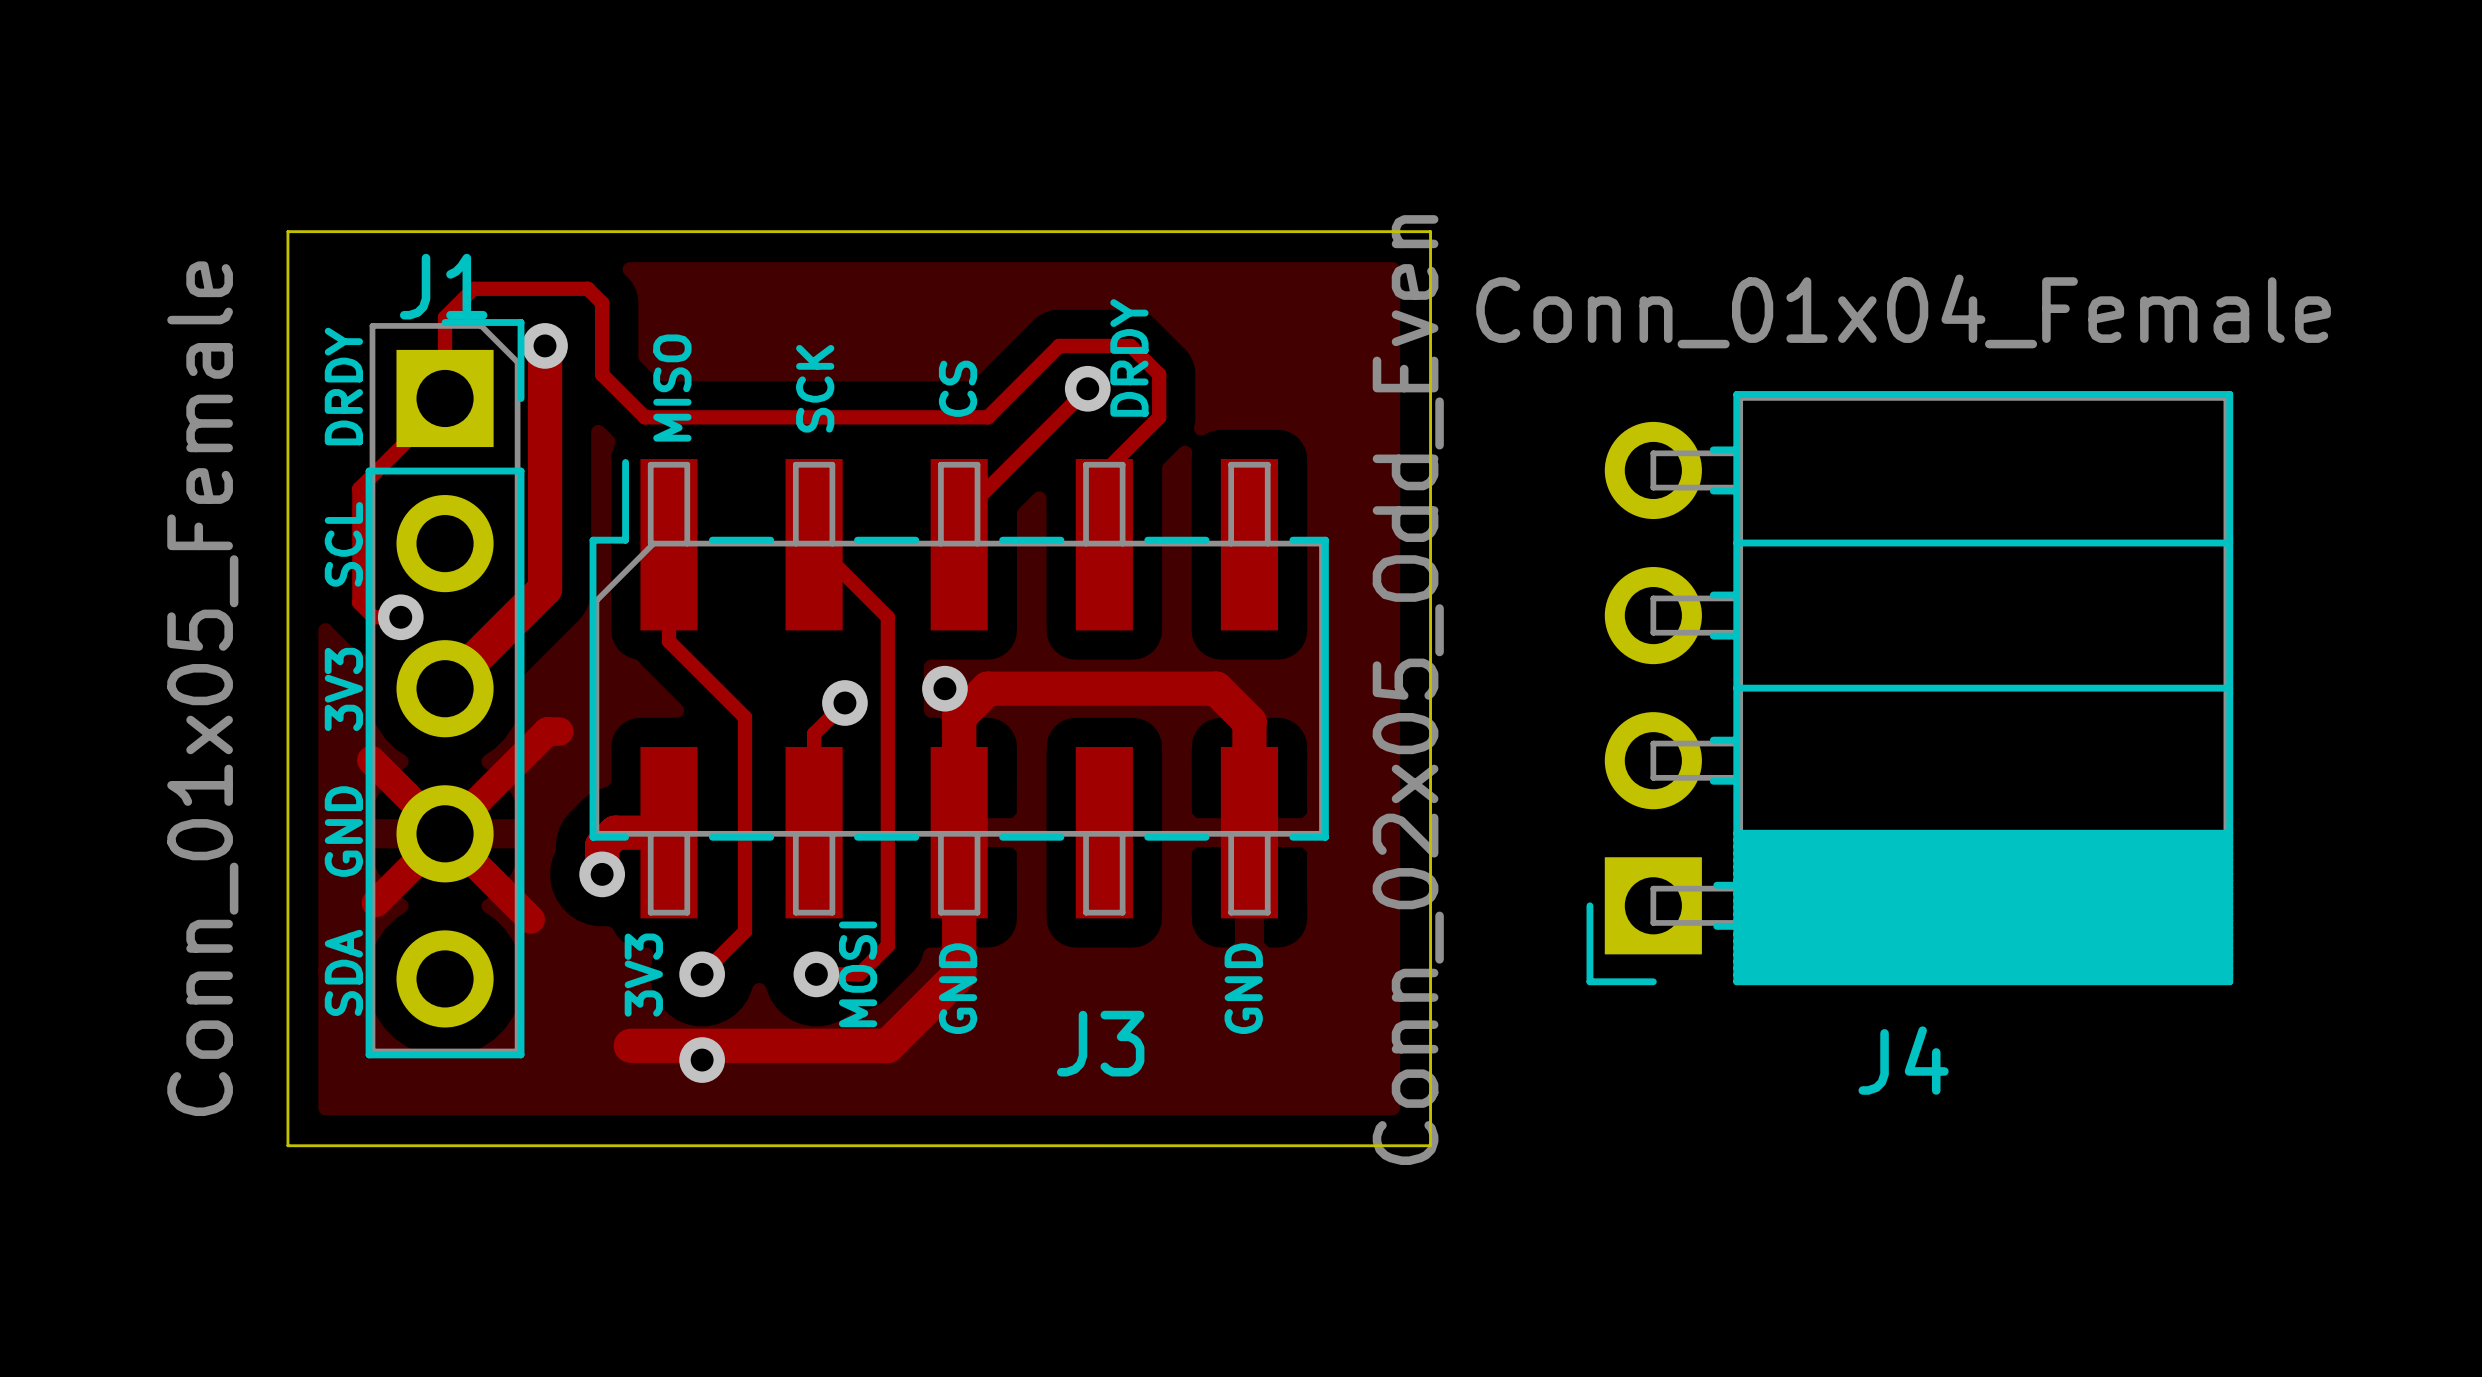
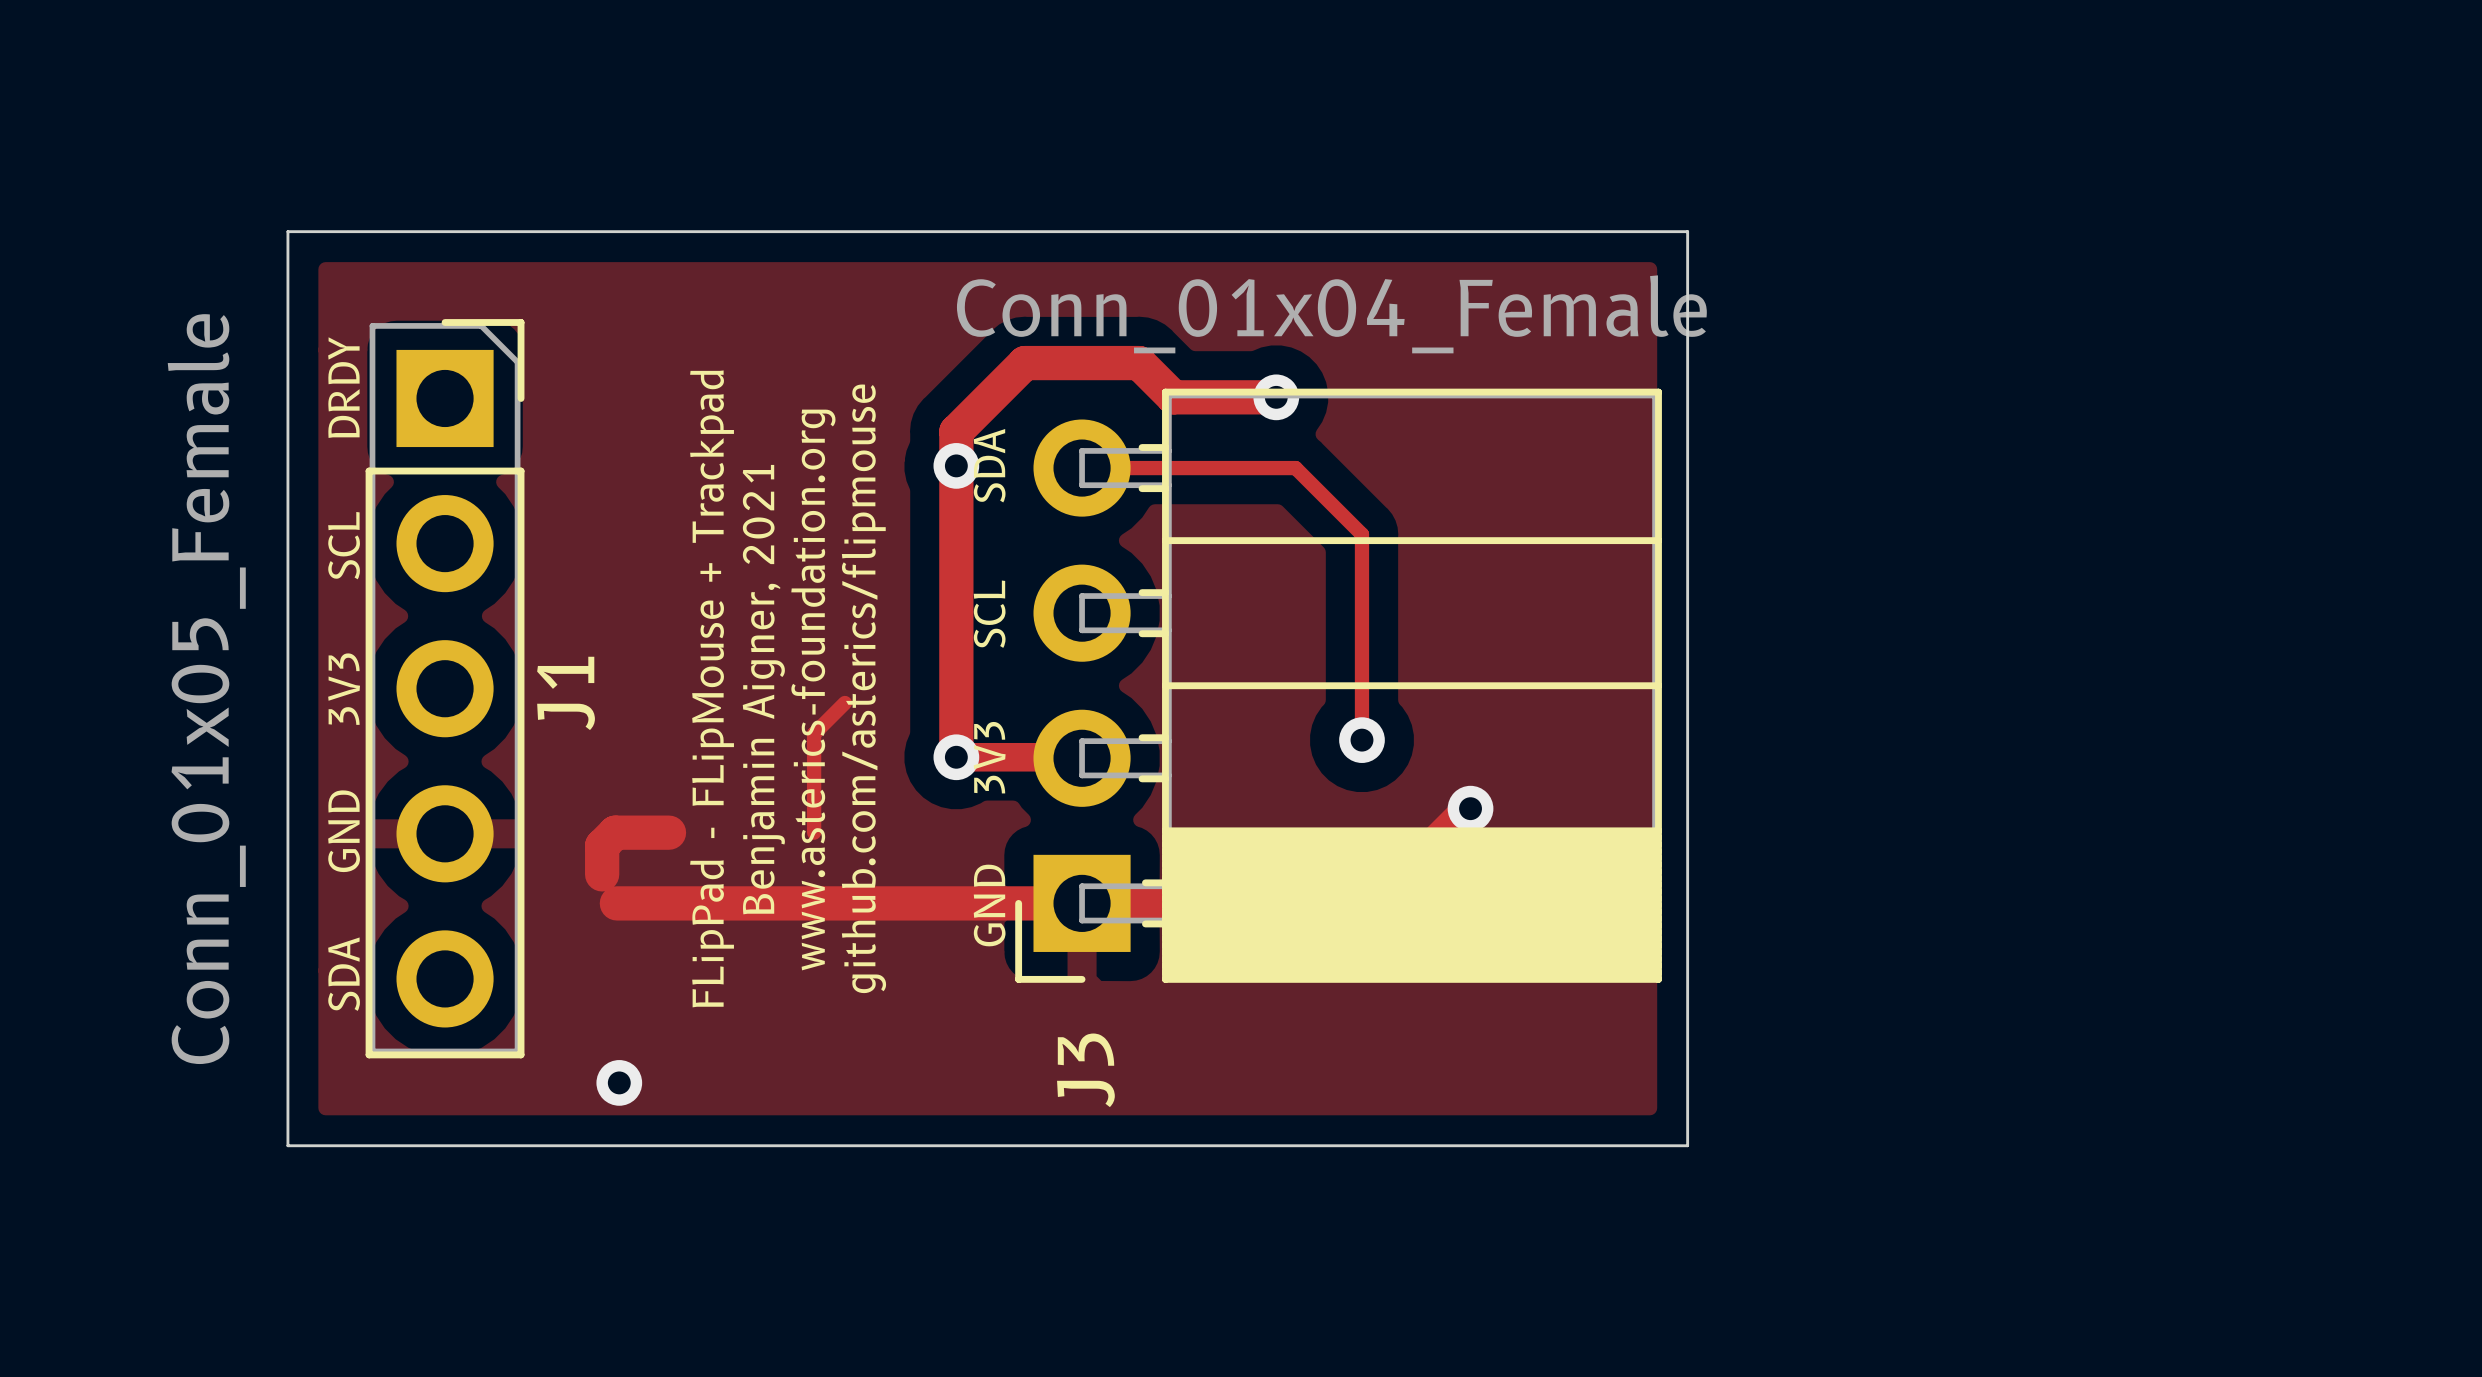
board edge: (1430, 231) (1430, 1145) -> (1430, 231) (1687, 231) (1687, 1145) (1430, 1145)
J1 name rotation: 0° (443, 286) -> 90° counterclockwise (566, 693)
J1 name position: J1 (443, 286) -> J1 (566, 693)
track: (545, 345) (545, 588) (445, 688) -> none
via: (545, 345) -> none
text: DRDY (1129, 357) -> none
text: MISO (672, 388) -> none
text: SCK (815, 388) -> none
text: CS (958, 388) -> none
track: (1087, 388) (959, 517) (959, 544) -> none
via: (1087, 388) -> none
track: none -> (1276, 397) (1173, 397) (1139, 363) (1024, 363) (956, 431) (956, 757) (1082, 758)
via: none -> (1276, 397)
J3 footprint: [589, 459, 1329, 919] -> [1015, 388, 1662, 983]
text: none -> SDA (989, 465)
via: none -> (956, 465)
track: none -> (1082, 468) (1295, 468) (1361, 534) (1361, 740)
track: (668, 544) (668, 641) (744, 717) (744, 931) (702, 974) -> none
track: (815, 544) (887, 617) (887, 945) (859, 974) (816, 974) -> none
track: (1104, 544) (1104, 472) (1159, 417) (1159, 374) (1130, 345) (1059, 345) (987, 417) (645, 417) (602, 374) (602, 303) (587, 288) (473, 288) (445, 317) (445, 403) (359, 488) (359, 603) (373, 617) (400, 617) -> none
text: none -> SCL (989, 614)
via: (400, 617) -> none
text: none -> Benjamin Aigner, 2021 (763, 689)
text: none -> FLipPad - FLipMouse + Trackpad (712, 688)
text: none -> github.com/asterics/flipmouse (863, 688)
via: (944, 688) -> none
J4: Conn_01x04_Female (1909, 688) -> none
text: none -> www.asterics-foundation.org (813, 689)
J3 value: Conn_02x05_Odd_Even (1408, 690) -> Conn_01x04_Female (1331, 314)
via: (844, 702) -> none
track: (559, 731) (547, 731) (375, 902) -> none
via: none -> (1361, 740)
via: none -> (956, 757)
track: (371, 760) (530, 919) -> none
track: none -> (1470, 808) (1375, 903) (616, 903)
via: none -> (1470, 808)
track: (1249, 832) (1249, 721) (1216, 688) (987, 688) (959, 717) (959, 974) (887, 1045) (630, 1045) -> none
via: (602, 874) -> none
via: (702, 974) -> none
via: (816, 974) -> none
text: MOSI (858, 974) -> none
text position: 3V3 (643, 975) -> 3V3 (989, 757)
text position: GND (958, 988) -> GND (989, 905)
text: GND (1243, 988) -> none
J3 name position: J3 (1100, 1043) -> J3 (1085, 1070)
via: (702, 1060) -> none
via: none -> (619, 1082)

